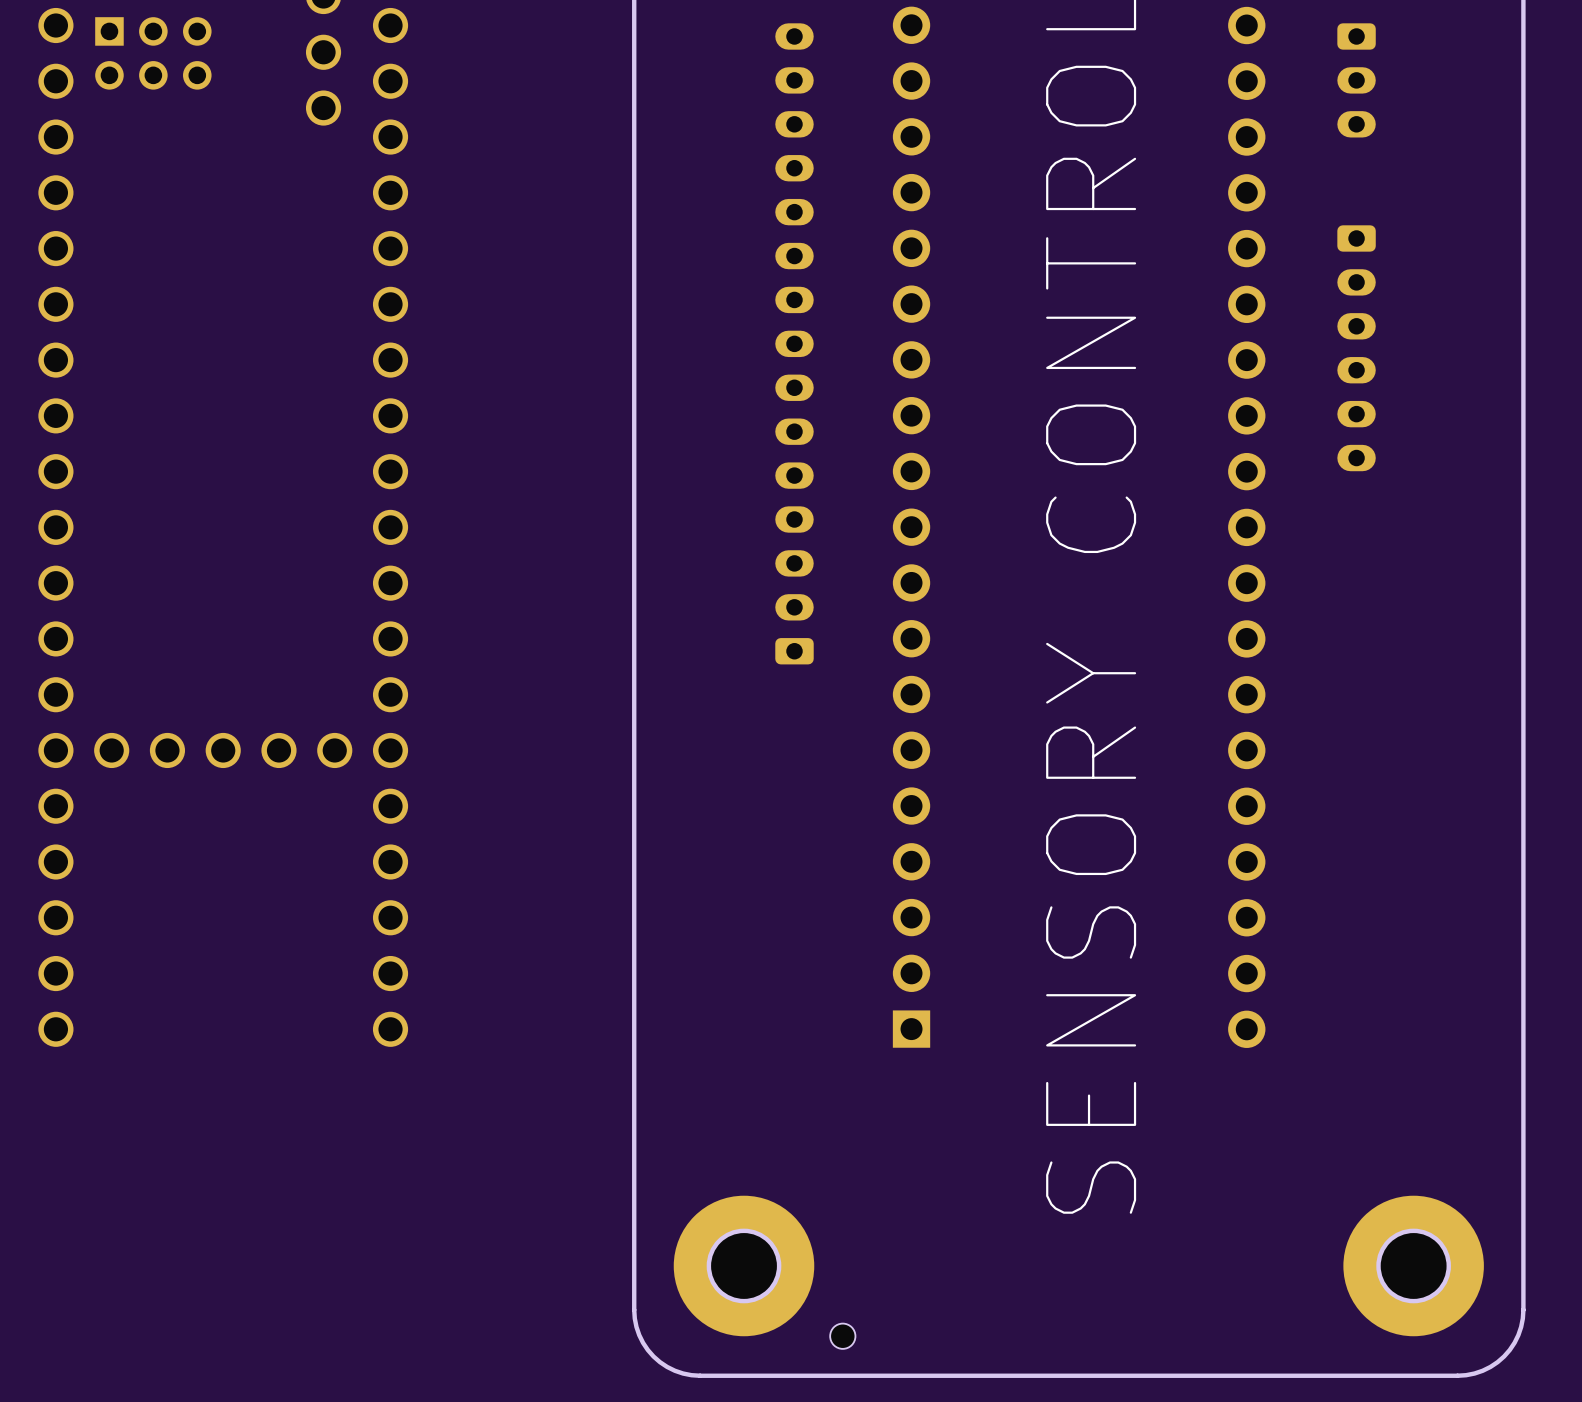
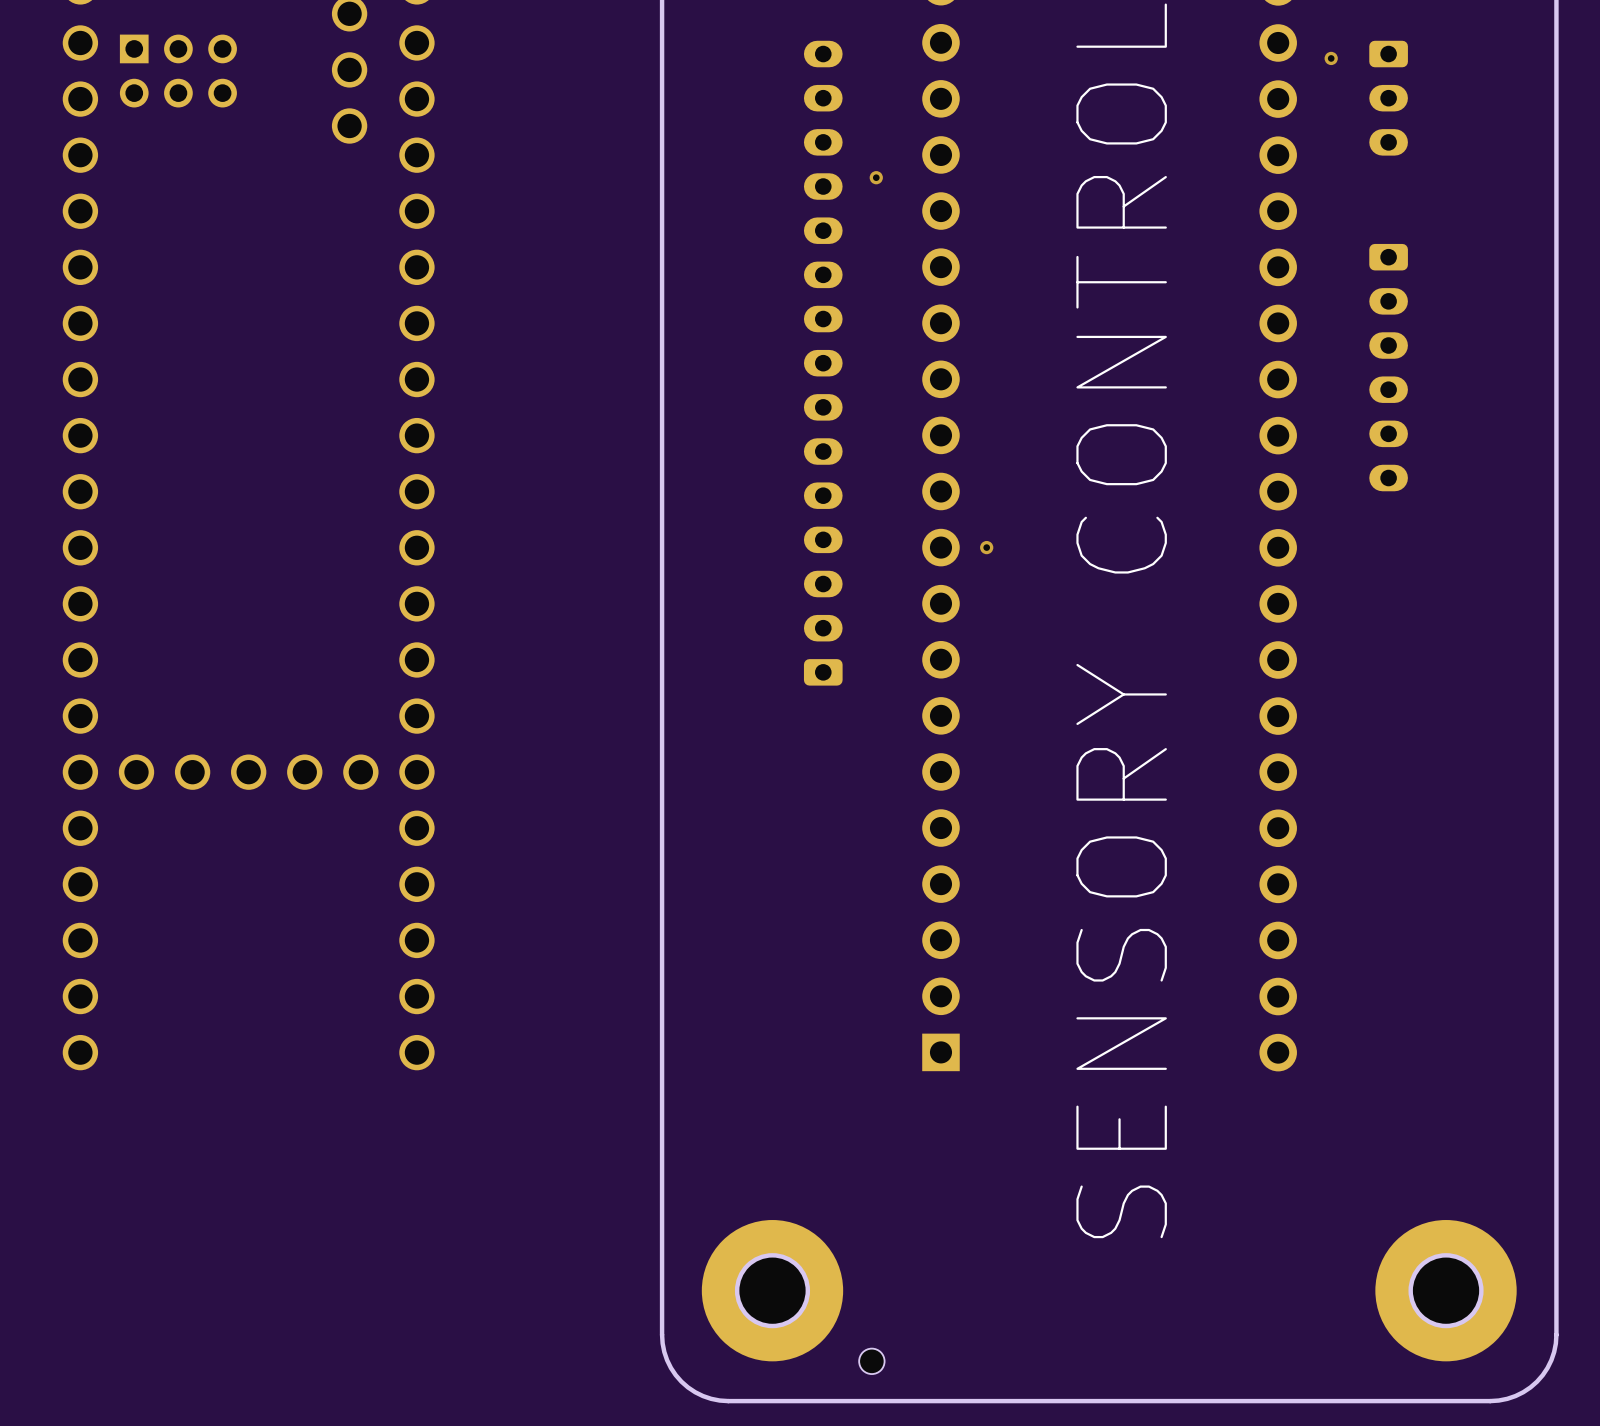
via: none -> (1331, 58)
via: none -> (876, 177)
via: none -> (986, 547)

